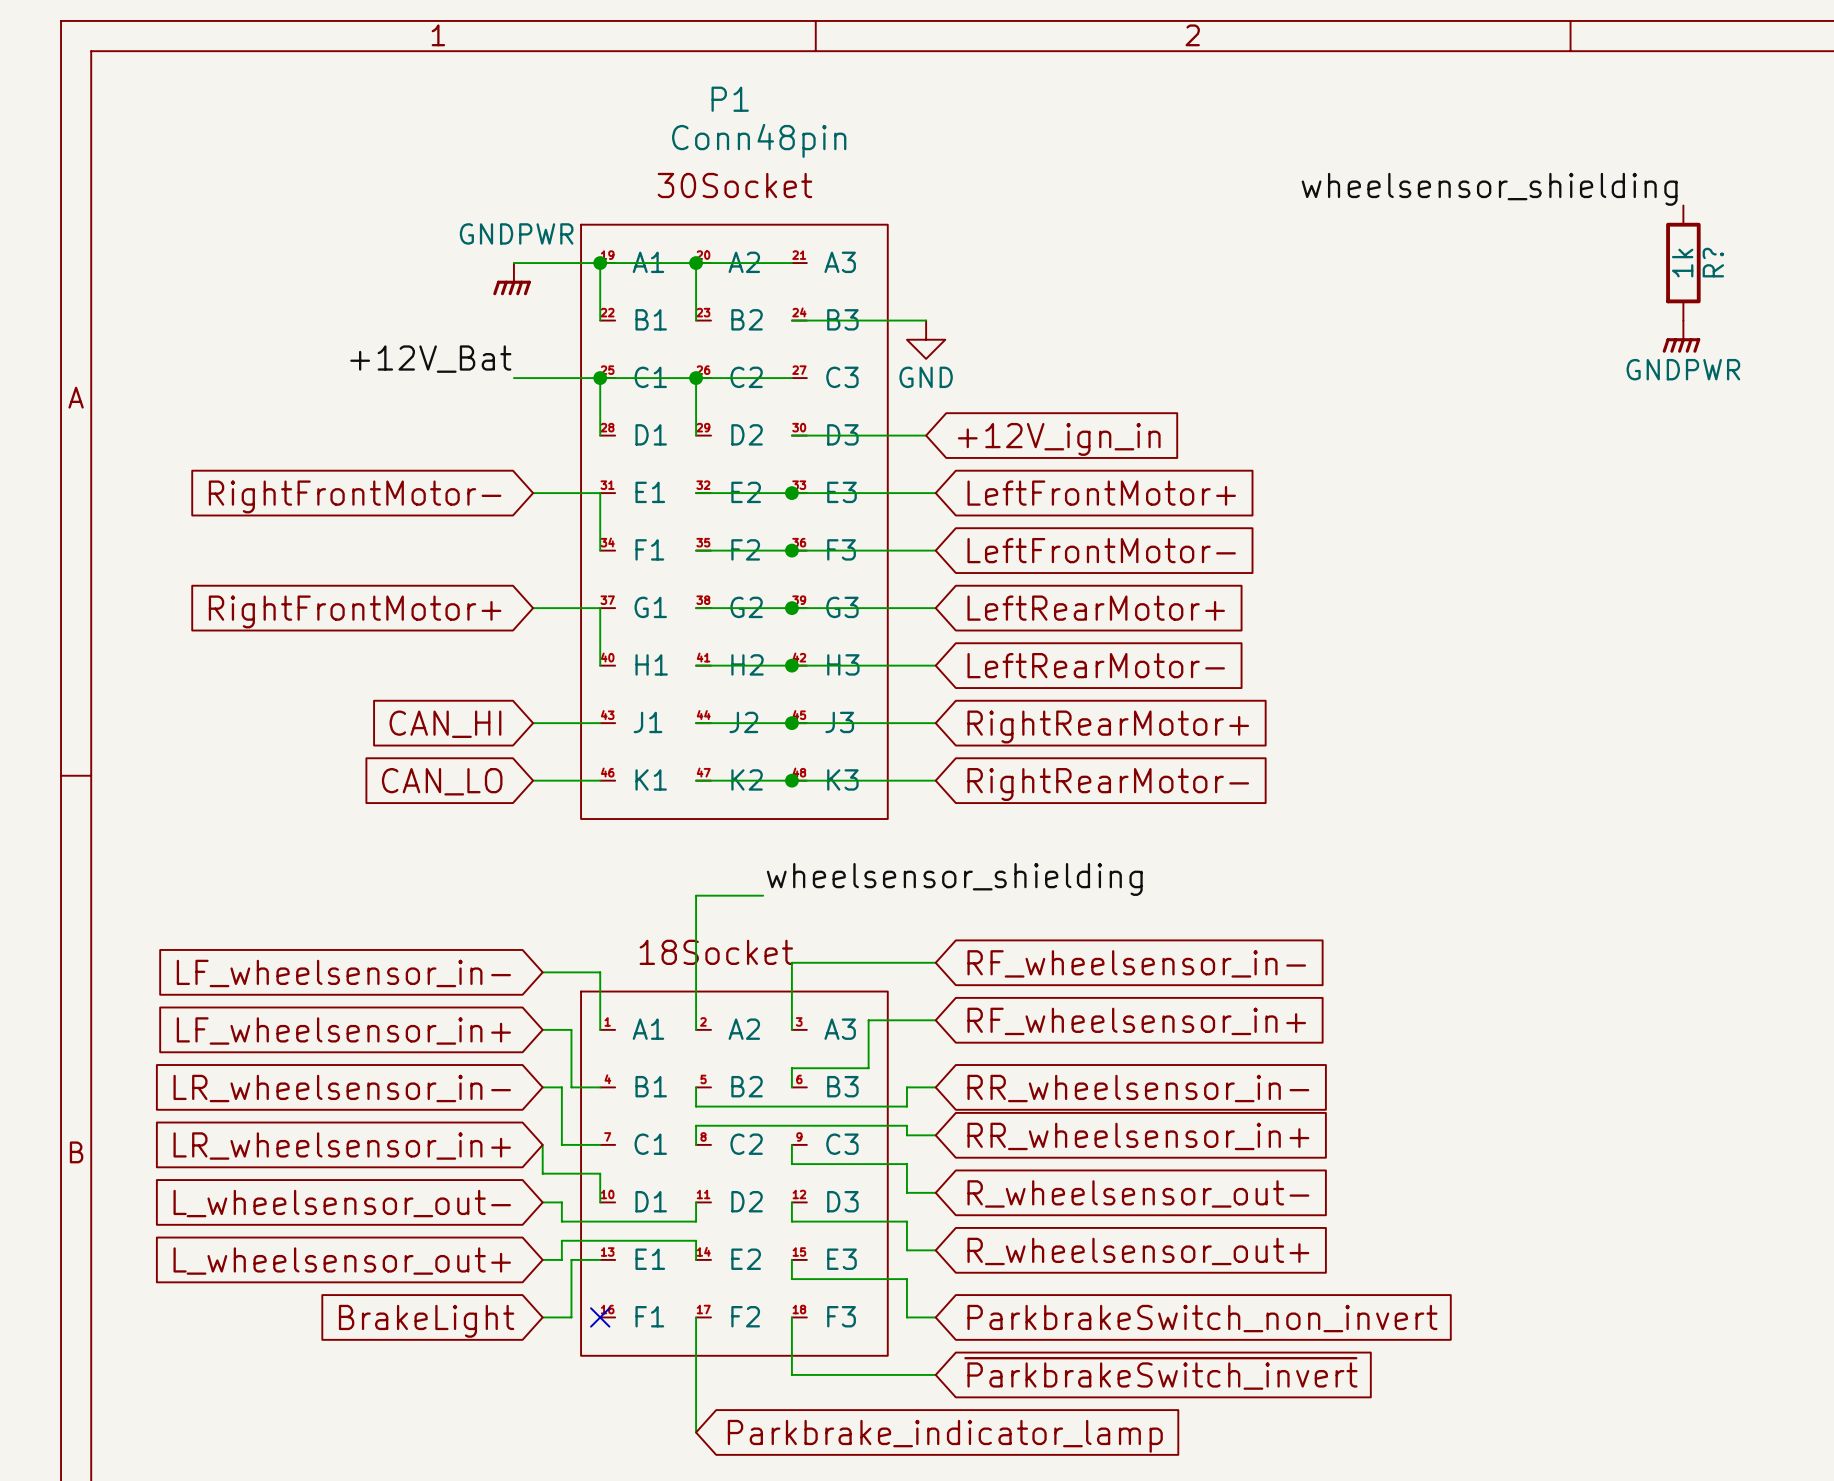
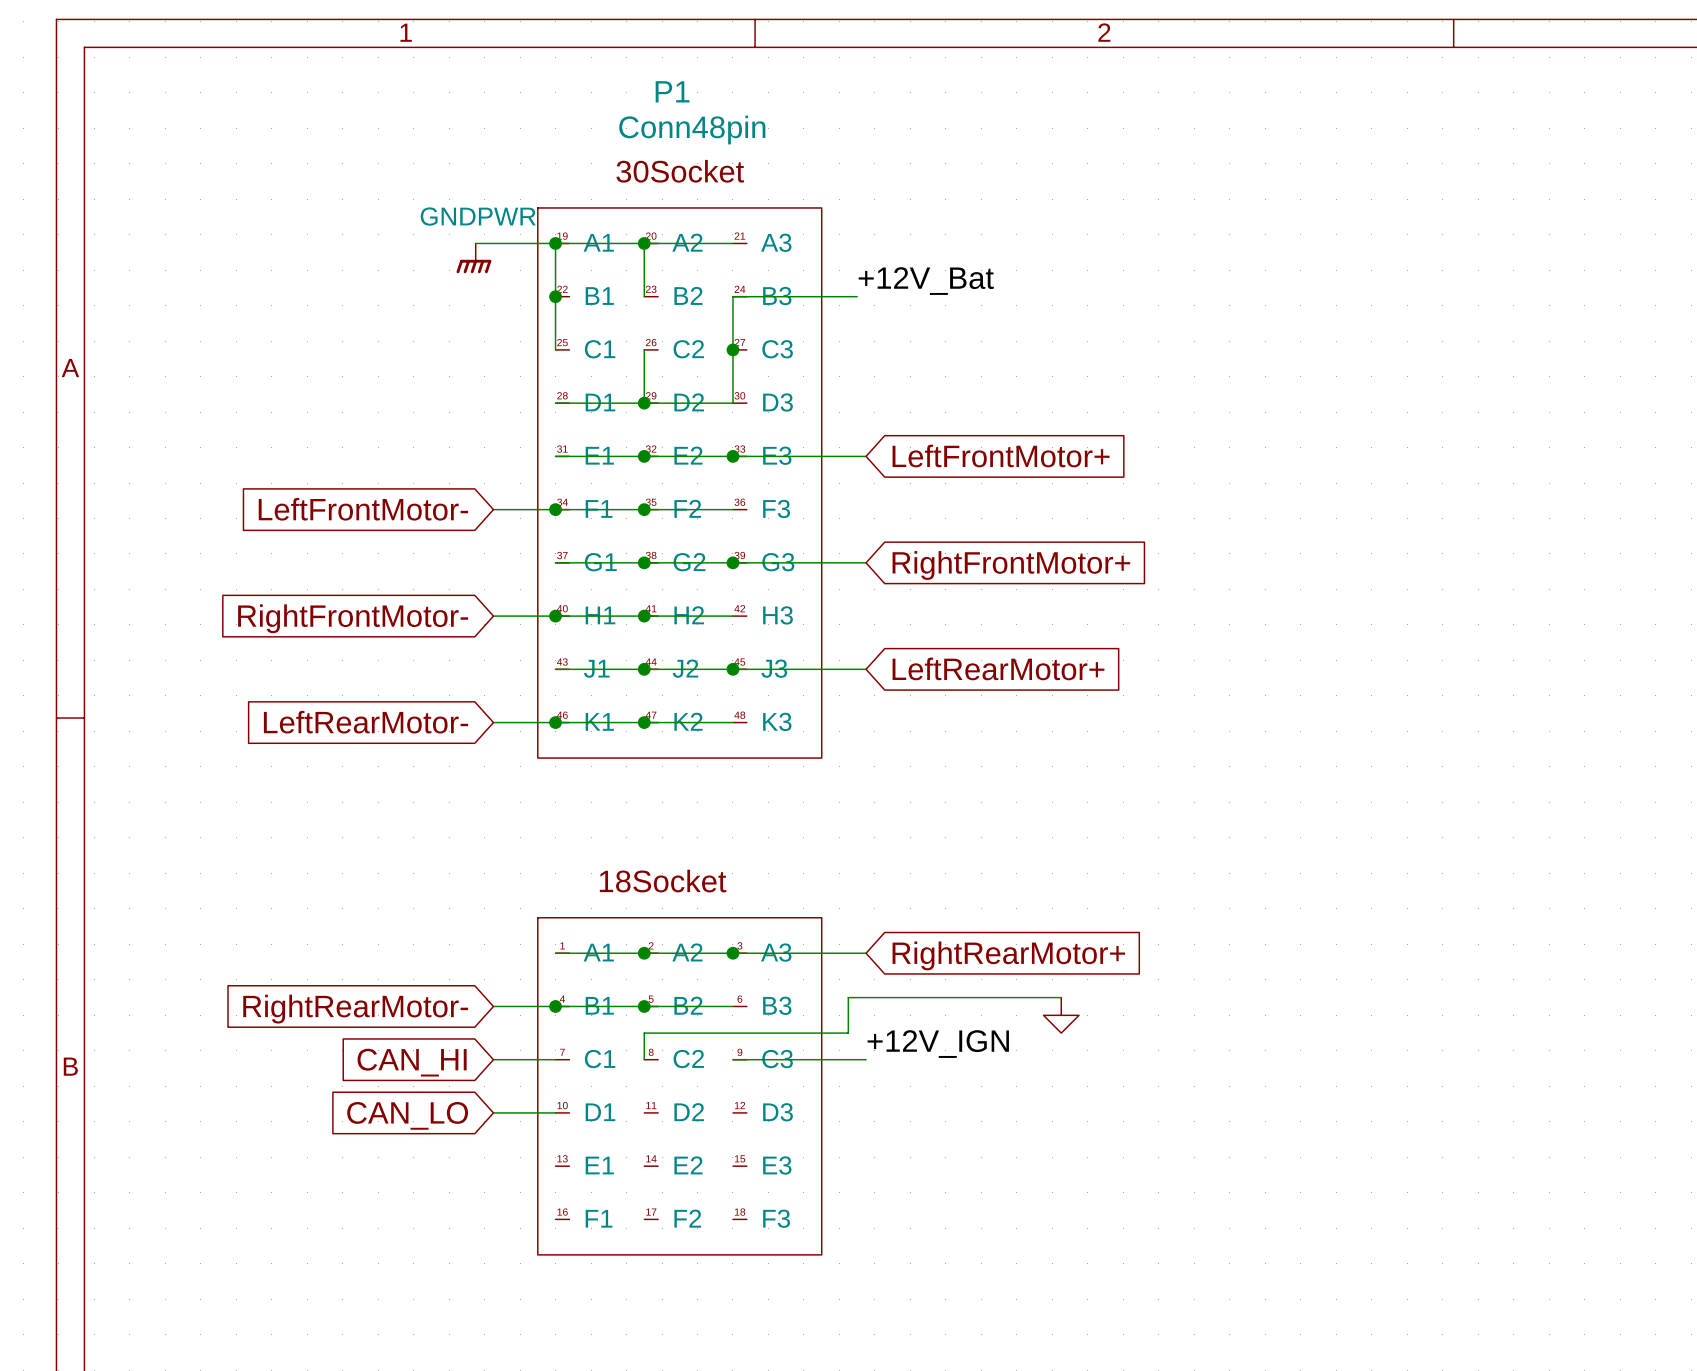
label: wheelsensor_shielding (1489, 189) -> none
R?: 1k (1683, 263) -> none
label: none -> +12V_Bat (926, 281)
junction: none -> (555, 296)
wire: none -> (732, 296) (732, 403) (555, 403)
power symbol: GNDPWR (1681, 336) -> none
power symbol: GND (926, 339) -> none
label: +12V_Bat (430, 359) -> none
wire: (513, 378) (791, 378) -> none
wire: (600, 378) (600, 435) -> (555, 349) (555, 296)
junction: (600, 378) -> none
junction: (696, 378) -> none
junction: none -> (732, 349)
junction: none -> (644, 403)
wire: (791, 435) (926, 435) -> none
global label: +12V_ign_in (1059, 439) -> none
wire: (533, 493) (600, 493) (600, 550) -> none
wire: none -> (555, 456) (644, 456)
junction: none -> (644, 456)
global label position: RightFrontMotor- (355, 496) -> RightFrontMotor- (353, 618)
global label: none -> LeftFrontMotor- (363, 509)
wire: none -> (493, 509) (644, 509)
junction: none -> (555, 509)
junction: none -> (644, 509)
wire: (791, 550) (935, 550) -> none
junction: (791, 550) -> none
global label: LeftFrontMotor- (1101, 550) -> none
wire: (533, 608) (600, 608) (600, 665) -> none
wire: none -> (555, 562) (644, 562)
junction: none -> (644, 562)
global label: LeftRearMotor+ (1096, 608) -> RightFrontMotor+ (1011, 565)
global label: RightFrontMotor+ (355, 611) -> none
wire: none -> (493, 616) (644, 616)
junction: none -> (555, 616)
junction: none -> (644, 616)
wire: (791, 665) (935, 665) -> none
junction: (791, 665) -> none
global label: LeftRearMotor- (1096, 665) -> none
wire: (533, 723) (600, 723) -> (644, 669) (555, 669)
junction: none -> (644, 669)
global label: CAN_HI (445, 724) -> none
global label: RightRearMotor+ (1108, 726) -> LeftRearMotor+ (998, 668)
wire: none -> (555, 722) (644, 722)
junction: none -> (555, 722)
junction: none -> (644, 722)
wire: (791, 780) (935, 780) -> none
junction: (791, 780) -> none
global label: CAN_LO (442, 781) -> LeftRearMotor- (366, 722)
global label: RightRearMotor- (1108, 784) -> none
label: wheelsensor_shielding (954, 879) -> none
wire: (763, 895) (696, 895) (696, 1029) -> none
wire: (935, 962) (791, 962) (791, 1029) -> none
global label: RF_wheelsensor_in- (1136, 963) -> none
wire: (542, 972) (600, 972) (600, 1029) -> (866, 953) (555, 953)
global label: LF_wheelsensor_in- (343, 973) -> none
wire: (935, 1020) (868, 1020) (868, 1068) (791, 1068) (791, 1087) -> (555, 1006) (732, 1006)
global label: RF_wheelsensor_in+ (1136, 1021) -> RightRearMotor+ (1008, 955)
wire: (542, 1029) (571, 1029) (571, 1087) -> none
junction: none -> (644, 953)
junction: none -> (732, 953)
global label: LF_wheelsensor_in+ (343, 1030) -> none
wire: none -> (493, 1006) (502, 1006)
wire: (561, 1087) (561, 1144) -> (520, 1006) (528, 1006)
junction: none -> (555, 1006)
wire: (696, 1087) (696, 1106) (906, 1106) (906, 1087) (935, 1087) -> none
junction: none -> (644, 1006)
global label: LR_wheelsensor_in- (342, 1088) -> RightRearMotor- (355, 1009)
global label: RR_wheelsensor_in- (1138, 1088) -> none
power symbol: none -> (1061, 1015)
wire: (696, 1125) (906, 1125) (906, 1135) (935, 1135) -> (644, 1041) (644, 1033) (848, 1033) (848, 997) (1061, 997)
label: none -> +12V_IGN (938, 1044)
global label: RR_wheelsensor_in+ (1138, 1136) -> none
wire: none -> (493, 1059) (520, 1059)
wire: (542, 1144) (542, 1173) (600, 1173) (600, 1202) -> (520, 1112) (555, 1112)
wire: (791, 1144) (791, 1164) (906, 1164) (906, 1192) (935, 1192) -> (732, 1059) (866, 1059)
global label: LR_wheelsensor_in+ (342, 1146) -> CAN_HI (412, 1062)
global label: R_wheelsensor_out- (1138, 1193) -> none
wire: none -> (493, 1112) (502, 1112)
wire: (561, 1202) (561, 1221) (696, 1221) (696, 1202) -> none
wire: (791, 1202) (791, 1221) (906, 1221) (906, 1250) (935, 1250) -> none
global label: L_wheelsensor_out- (342, 1203) -> CAN_LO (407, 1115)
global label: R_wheelsensor_out+ (1138, 1251) -> none
wire: (542, 1259) (561, 1259) (561, 1240) (696, 1240) (696, 1259) -> none
wire: (600, 1259) (571, 1259) (571, 1317) (542, 1317) -> none
wire: (791, 1259) (791, 1279) (906, 1279) (906, 1317) (935, 1317) -> none
global label: L_wheelsensor_out+ (342, 1261) -> none
no-connect mark: (600, 1317) -> none
wire: (696, 1317) (696, 1432) -> none
wire: (791, 1317) (791, 1374) (935, 1374) -> none
global label: ParkbrakeSwitch_non_invert (1202, 1318) -> none
global label: BrakeLight (426, 1321) -> none
global label: ~{ParkbrakeSwitch_invert} (1160, 1373) -> none
global label: Parkbrake_indicator_lamp (945, 1436) -> none

